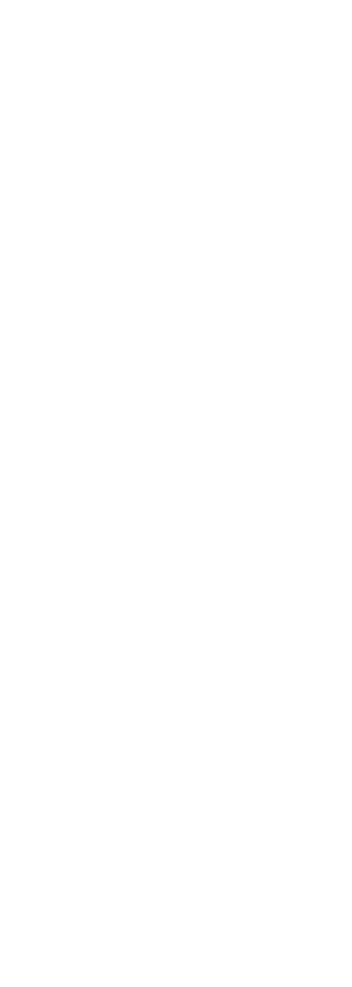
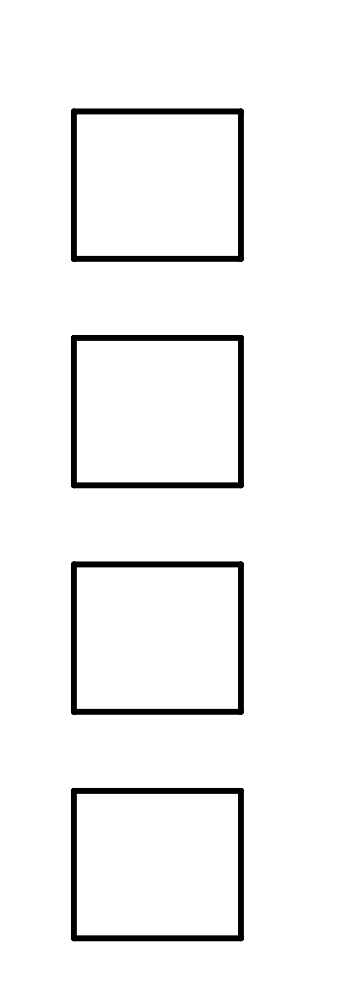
part: none -> (157, 185)
part: none -> (157, 411)
part: none -> (157, 638)
part: none -> (157, 864)

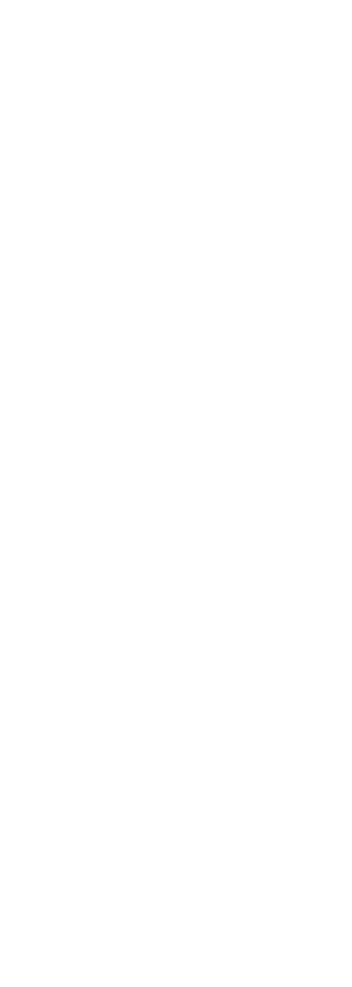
part: (157, 185) -> none
part: (157, 411) -> none
part: (157, 638) -> none
part: (157, 864) -> none

